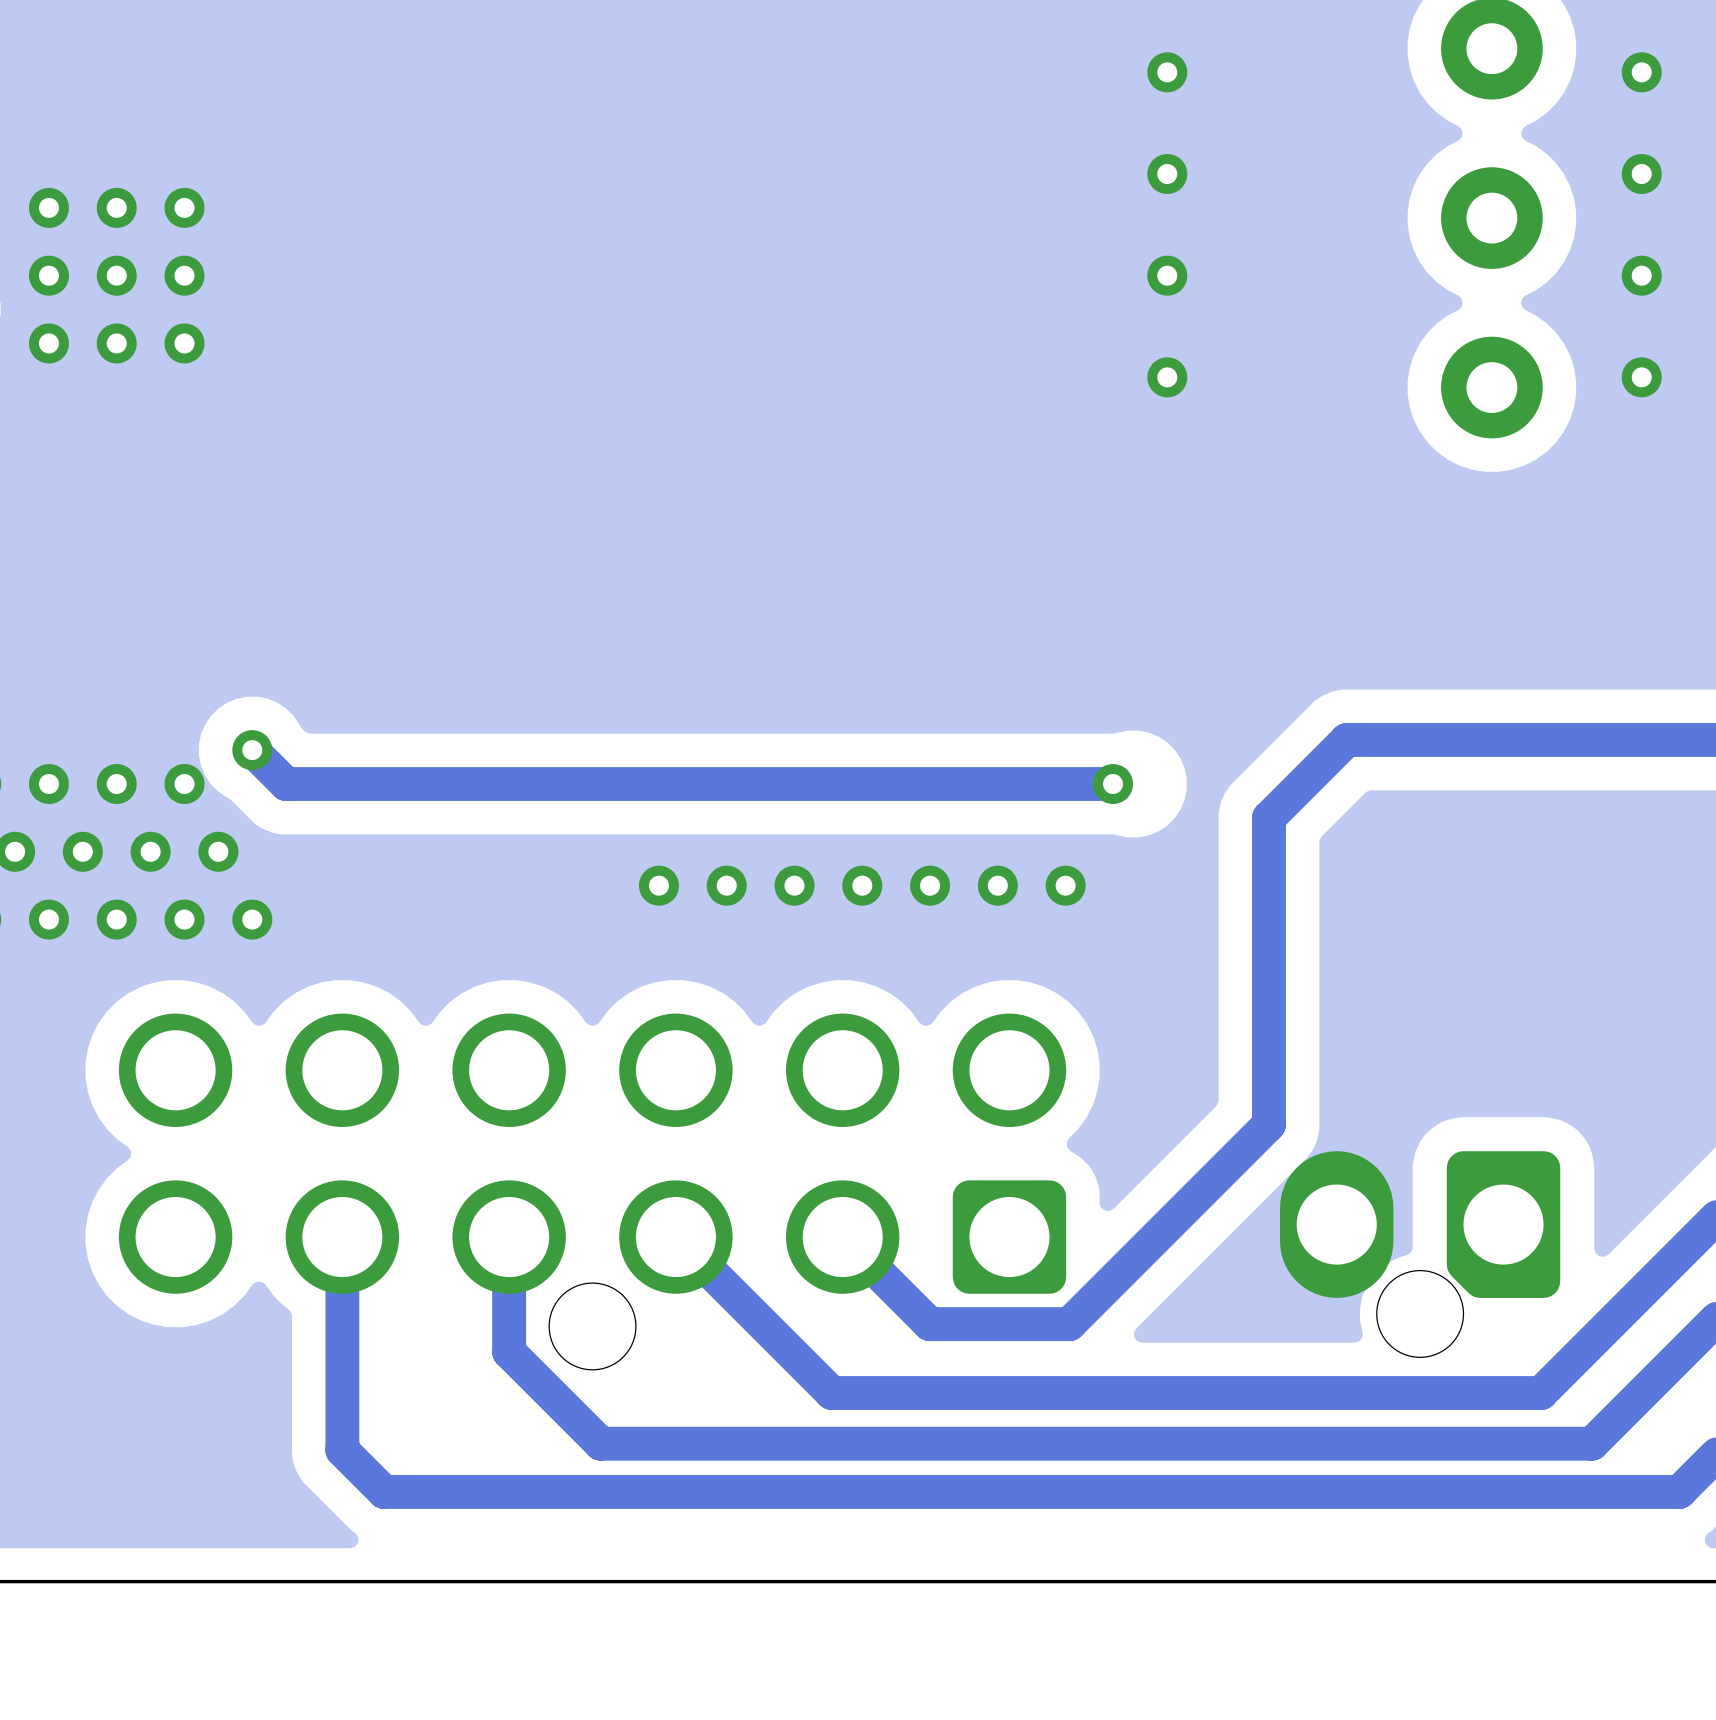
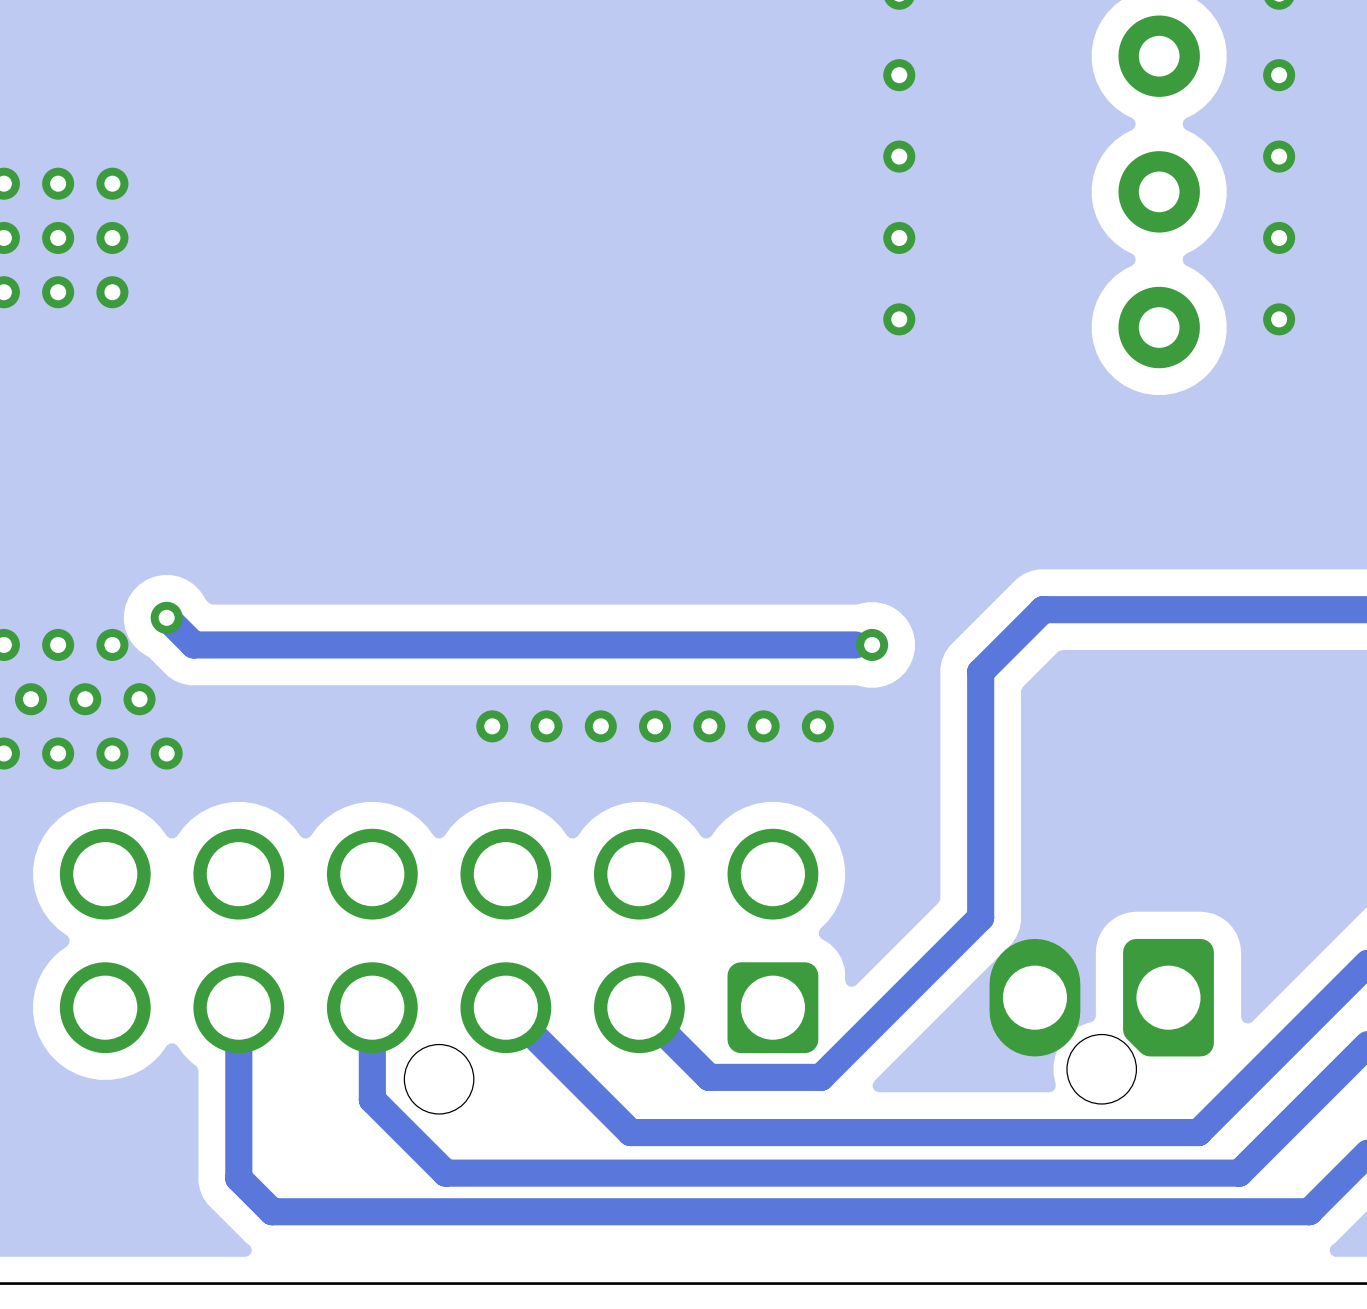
via position: (1113, 784) -> (872, 644)

